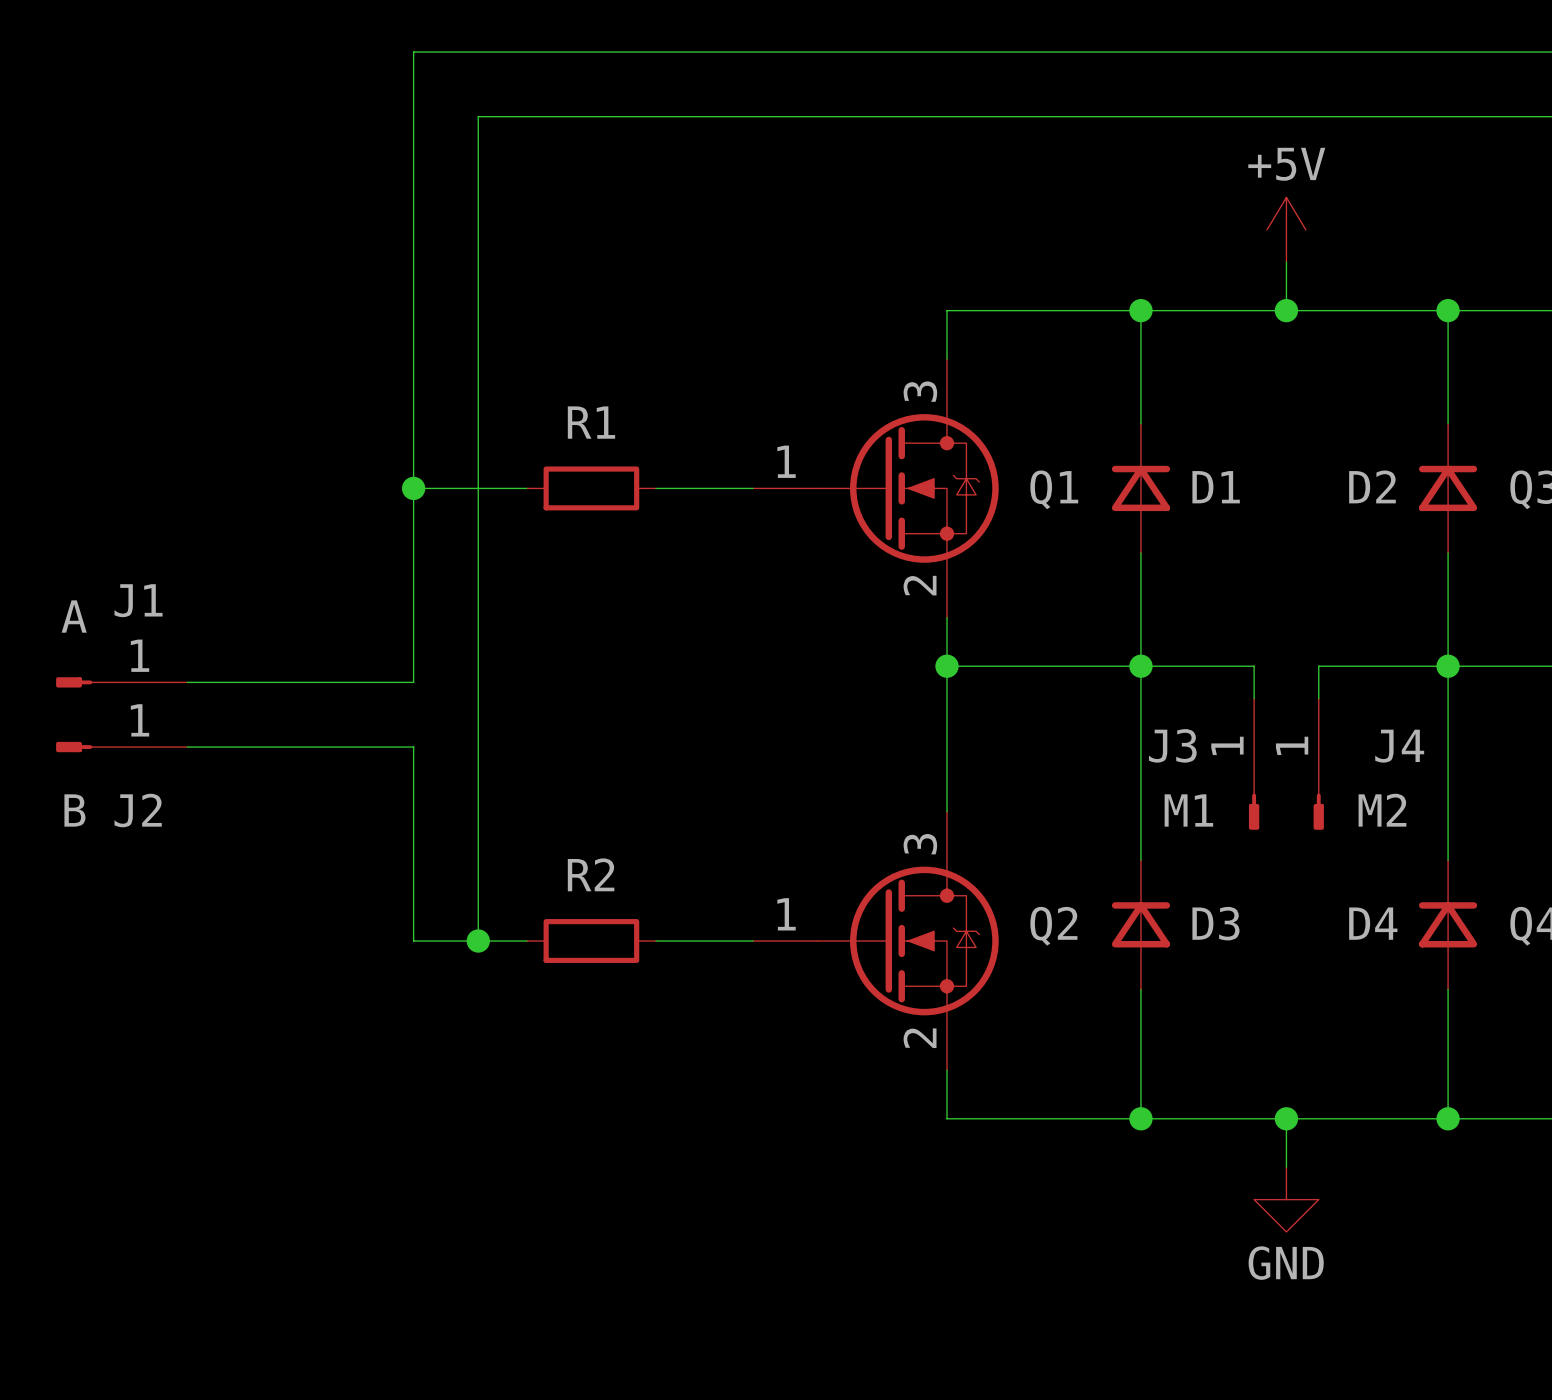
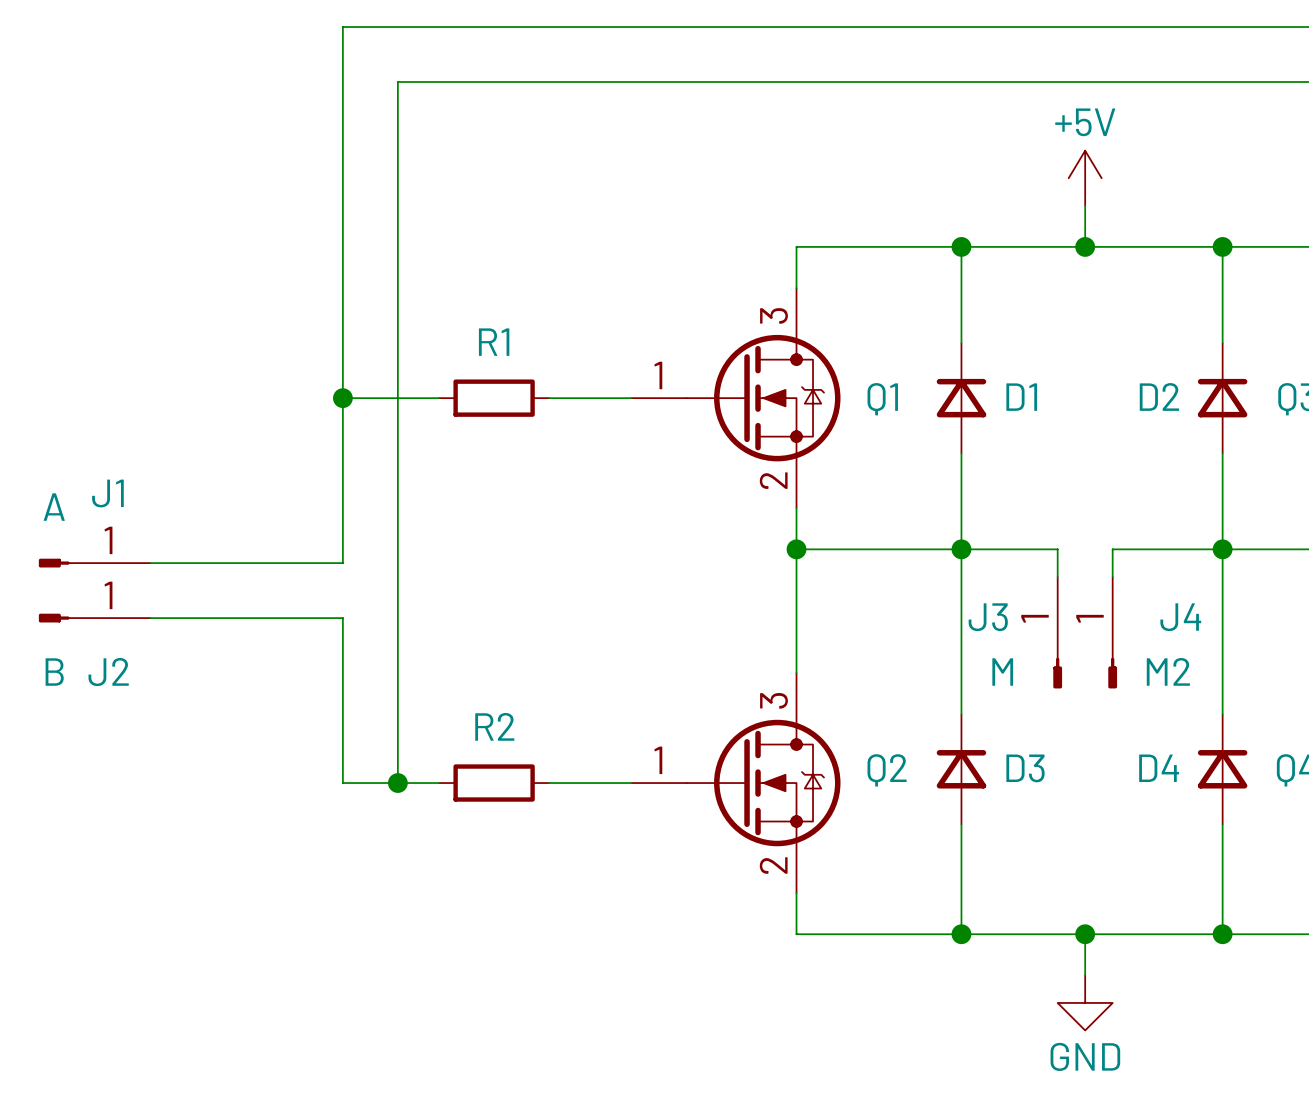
J3 value: M1 (1188, 810) -> M (1002, 672)

